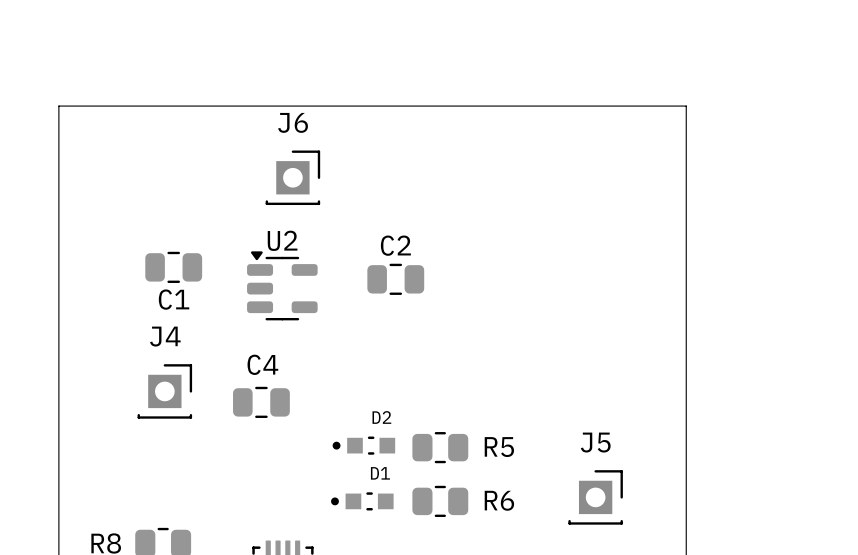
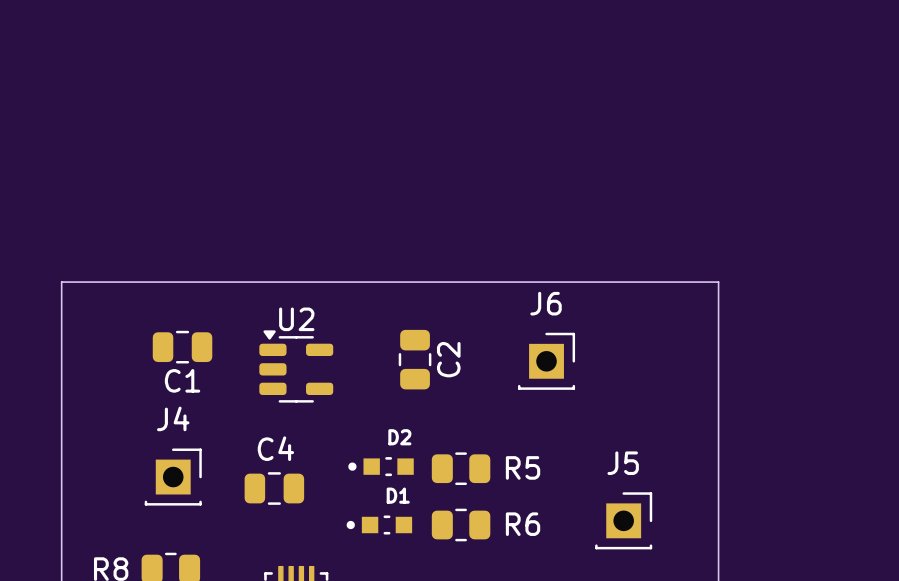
J6 position: (292, 177) -> (546, 361)
C1 position: (173, 267) -> (182, 347)
board edge: (58, 269) (58, 106) (686, 106) (686, 269) -> (61, 282) (718, 282)
C2 rotation: 0° (395, 279) -> 90° clockwise (415, 359)
C2 position: (395, 279) -> (415, 359)
U2 position: (282, 285) -> (296, 366)
J4 position: (164, 391) -> (173, 477)
C4 position: (261, 402) -> (274, 488)

